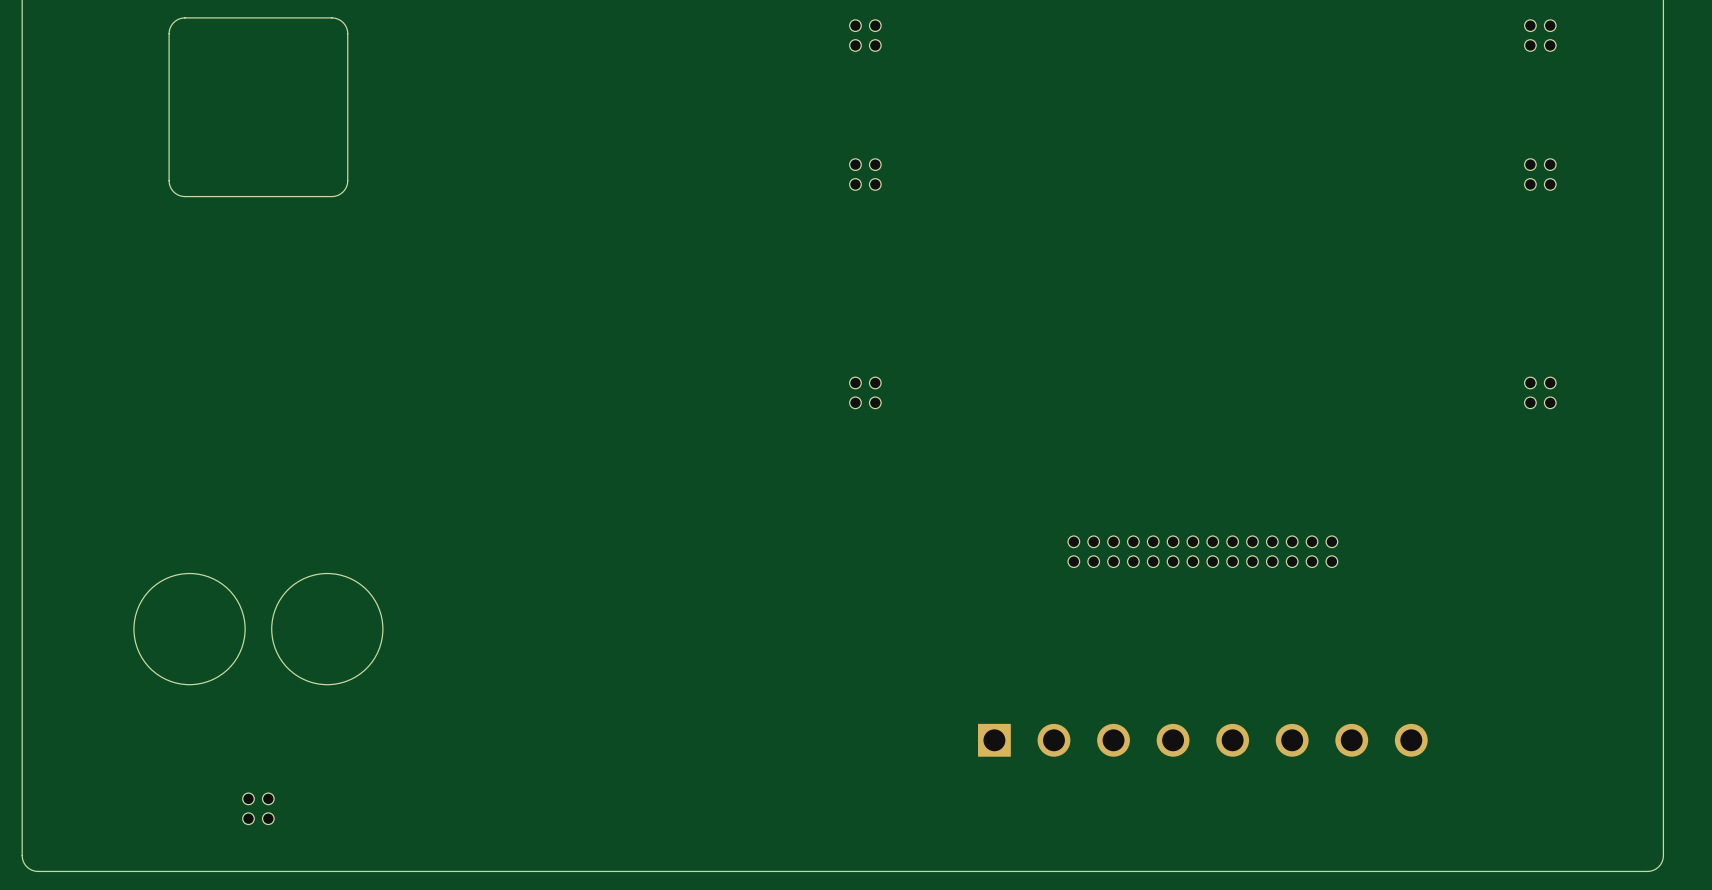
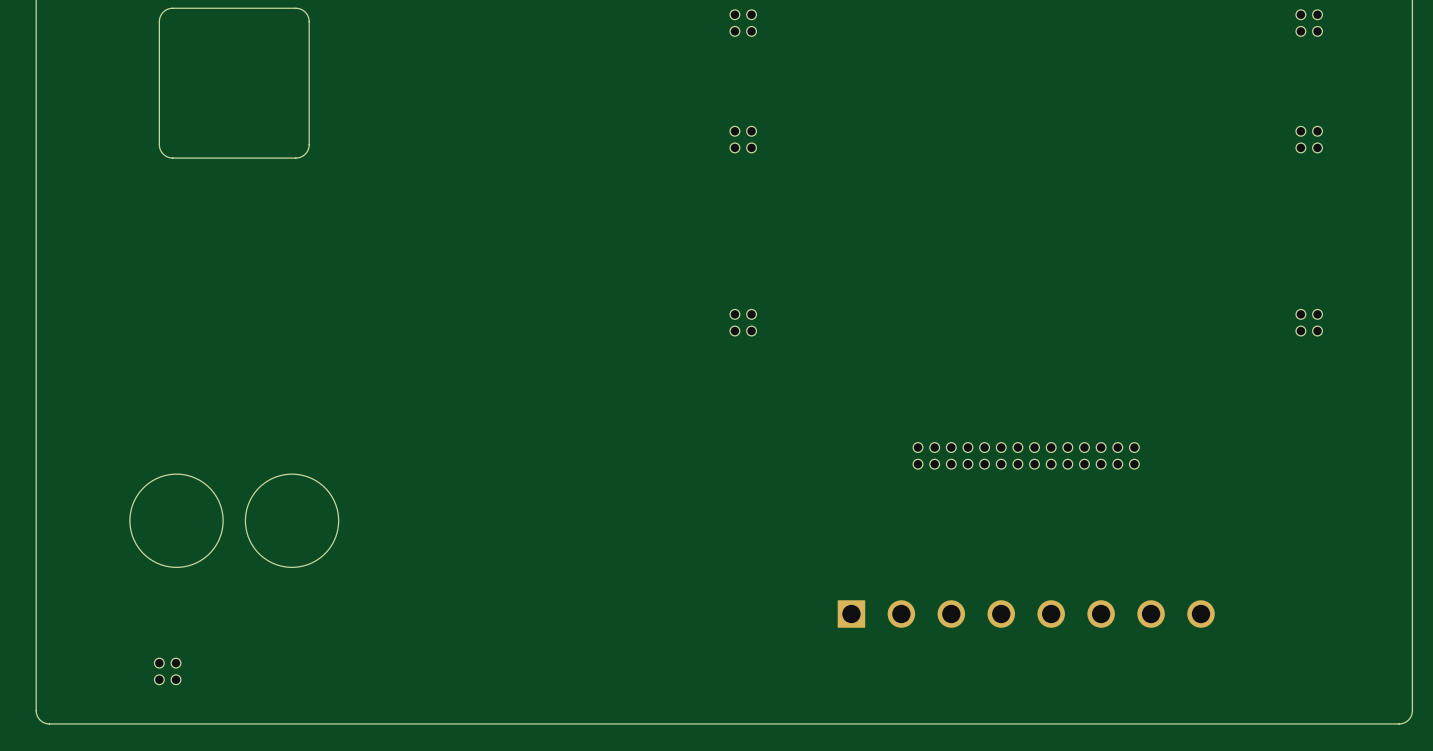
part position: (258, 808) -> (167, 671)

